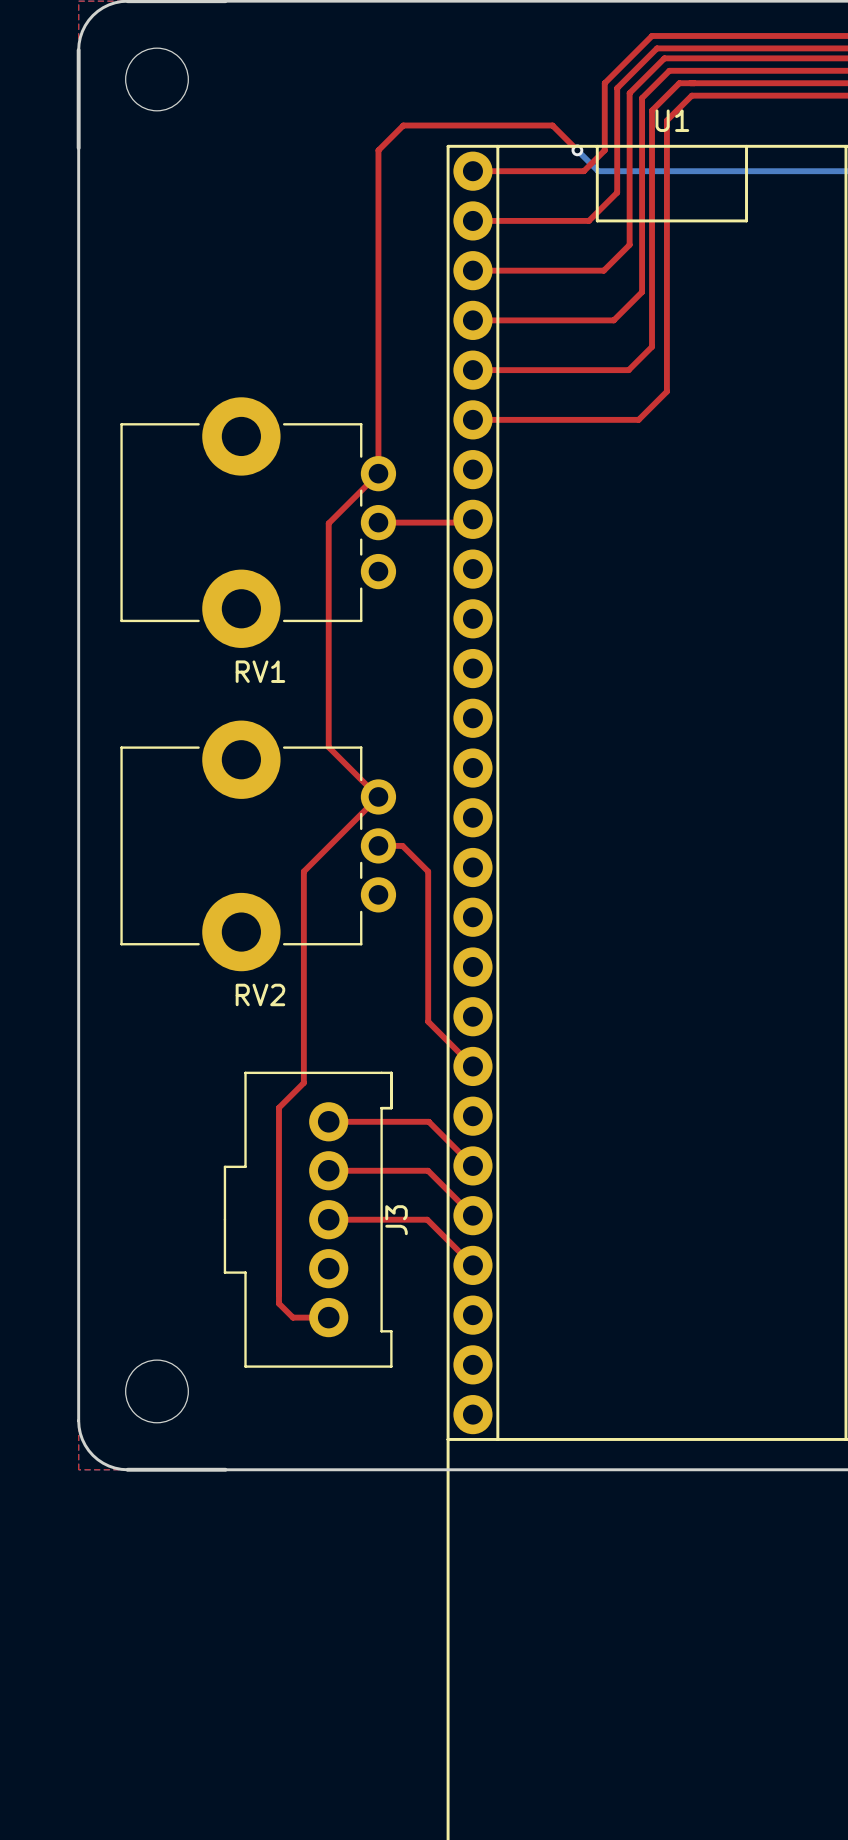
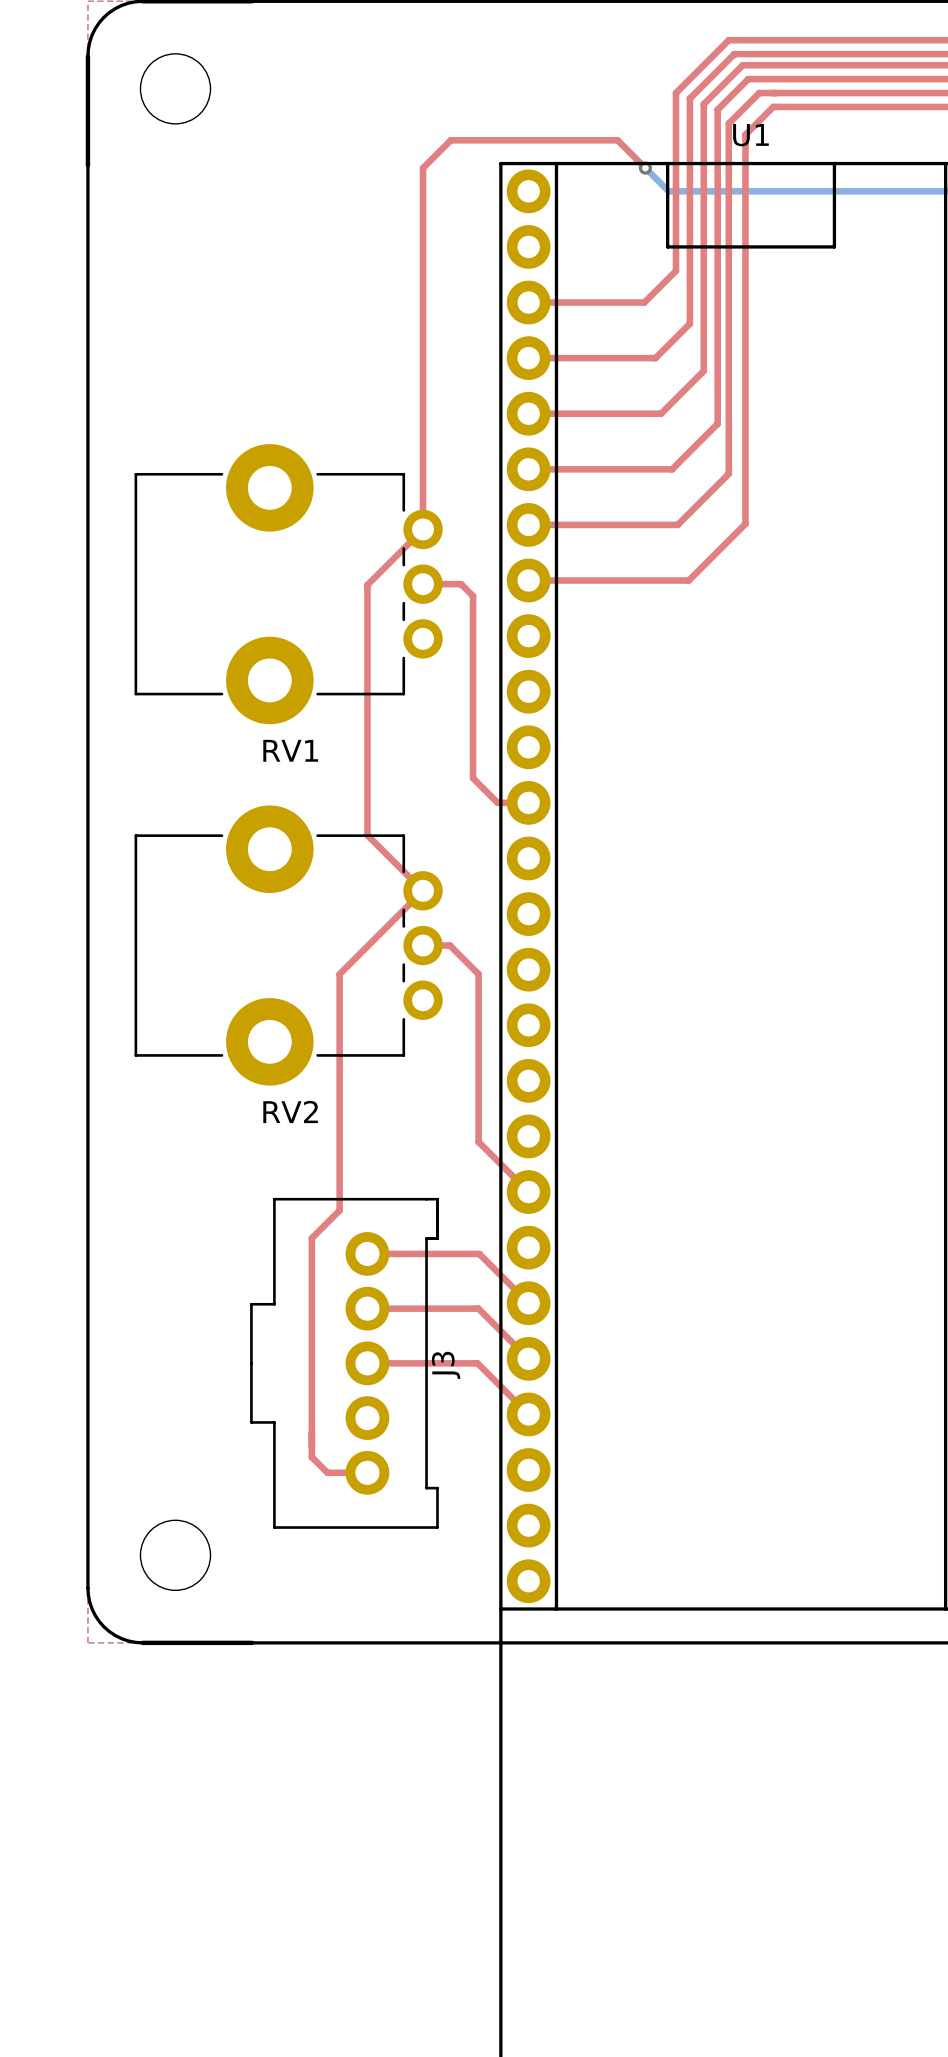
top track: (604, 150) (583, 171) (472, 171) -> none
top track: (617, 192) (588, 220) (472, 220) -> (689, 215) (689, 323) (655, 358)
top track: (629, 244) (603, 270) (576, 270) -> (675, 168) (675, 270) (644, 302)
top track: (642, 292) (613, 320) (586, 320) -> (717, 326) (717, 423) (672, 469)
top track: (652, 346) (628, 370) (591, 370) -> (703, 273) (703, 371) (661, 413)
top track: none -> (728, 387) (728, 473) (677, 524) (528, 524)
top track: (666, 391) (638, 419) (601, 419) -> (745, 437) (745, 523) (688, 580) (528, 580)
top track: (412, 522) (469, 522) -> (461, 584) (473, 596) (473, 778) (497, 802) (528, 802)

